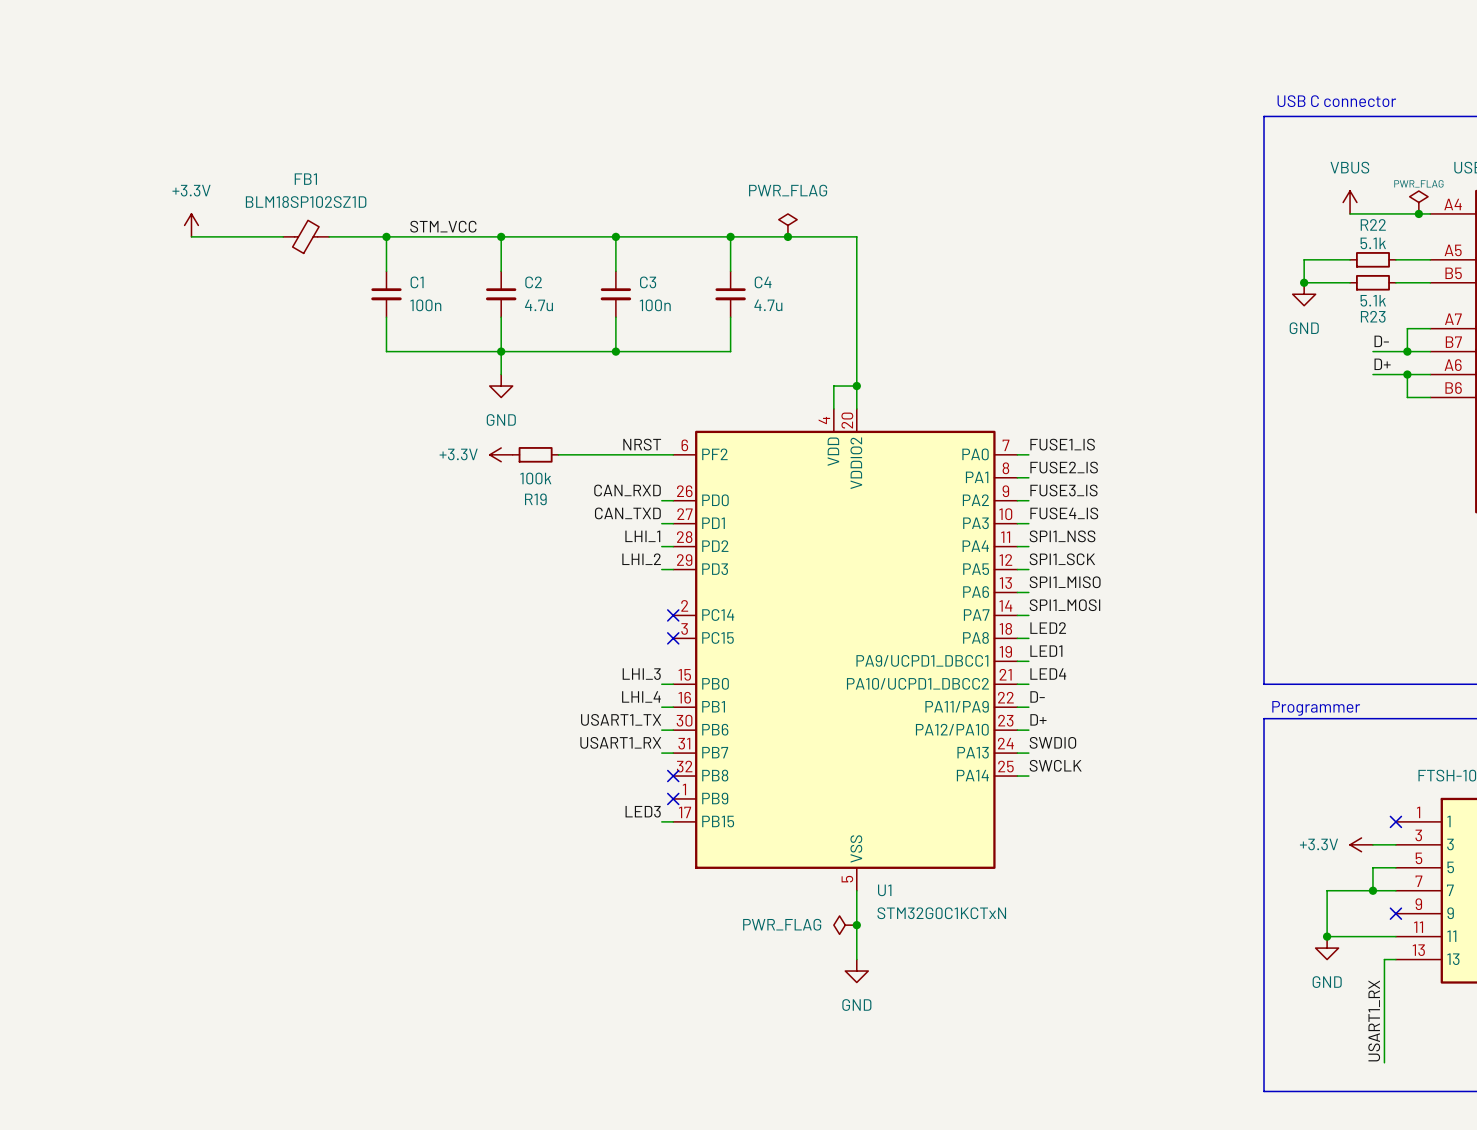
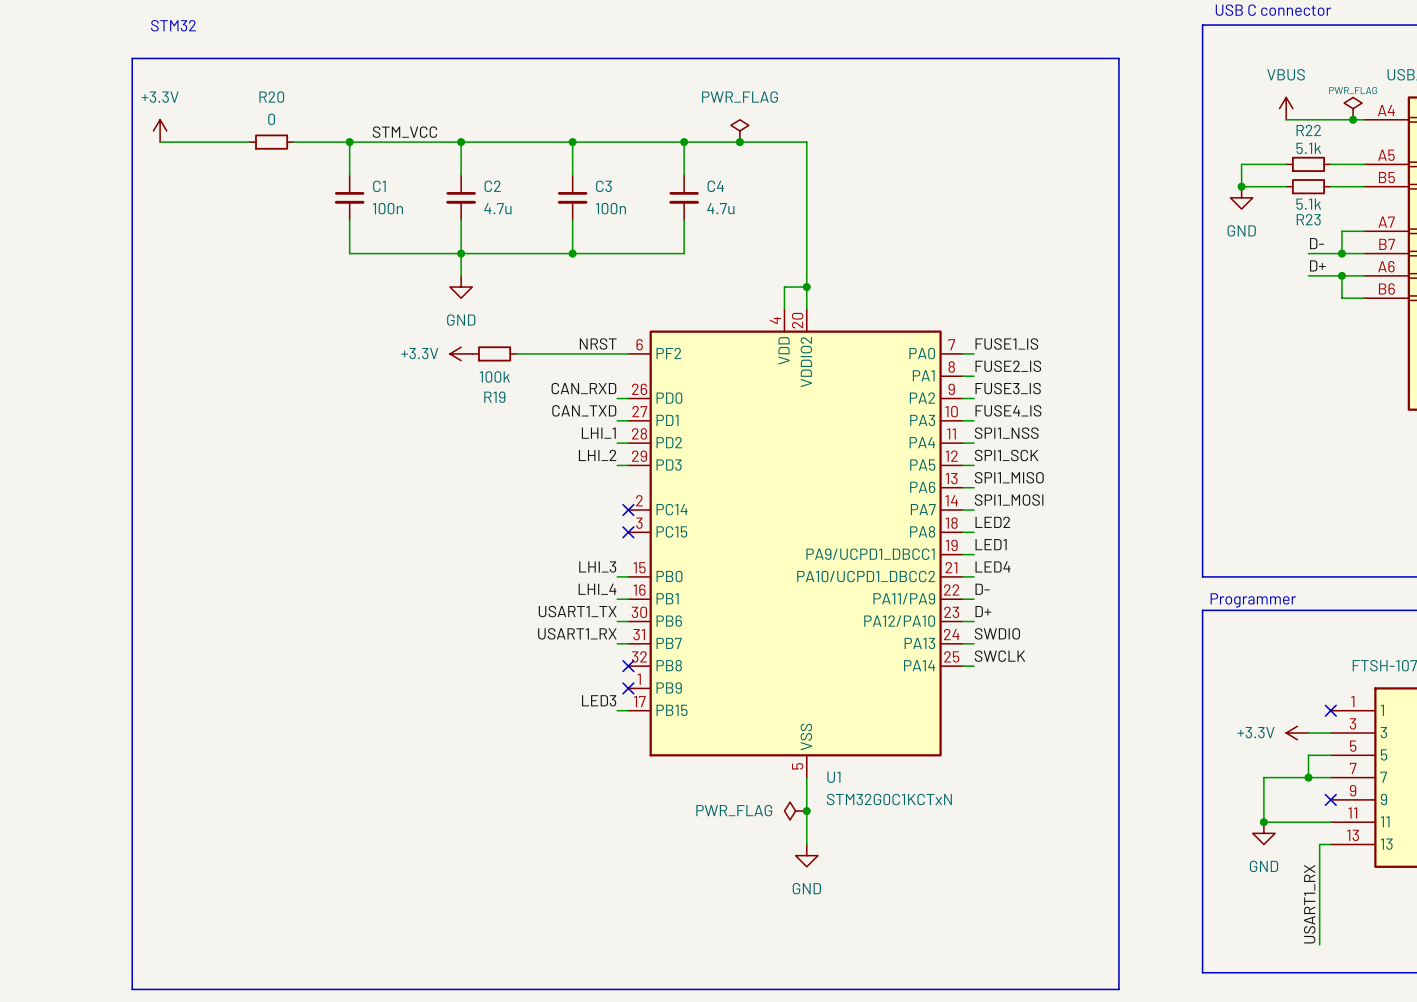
text: none -> STM32 (173, 25)
line: none -> (132, 58) (1118, 58) (1118, 989) (132, 989) (132, 58)
FB1: BLM18SP102SZ1D (306, 236) -> none
R20: none -> 0 (271, 142)

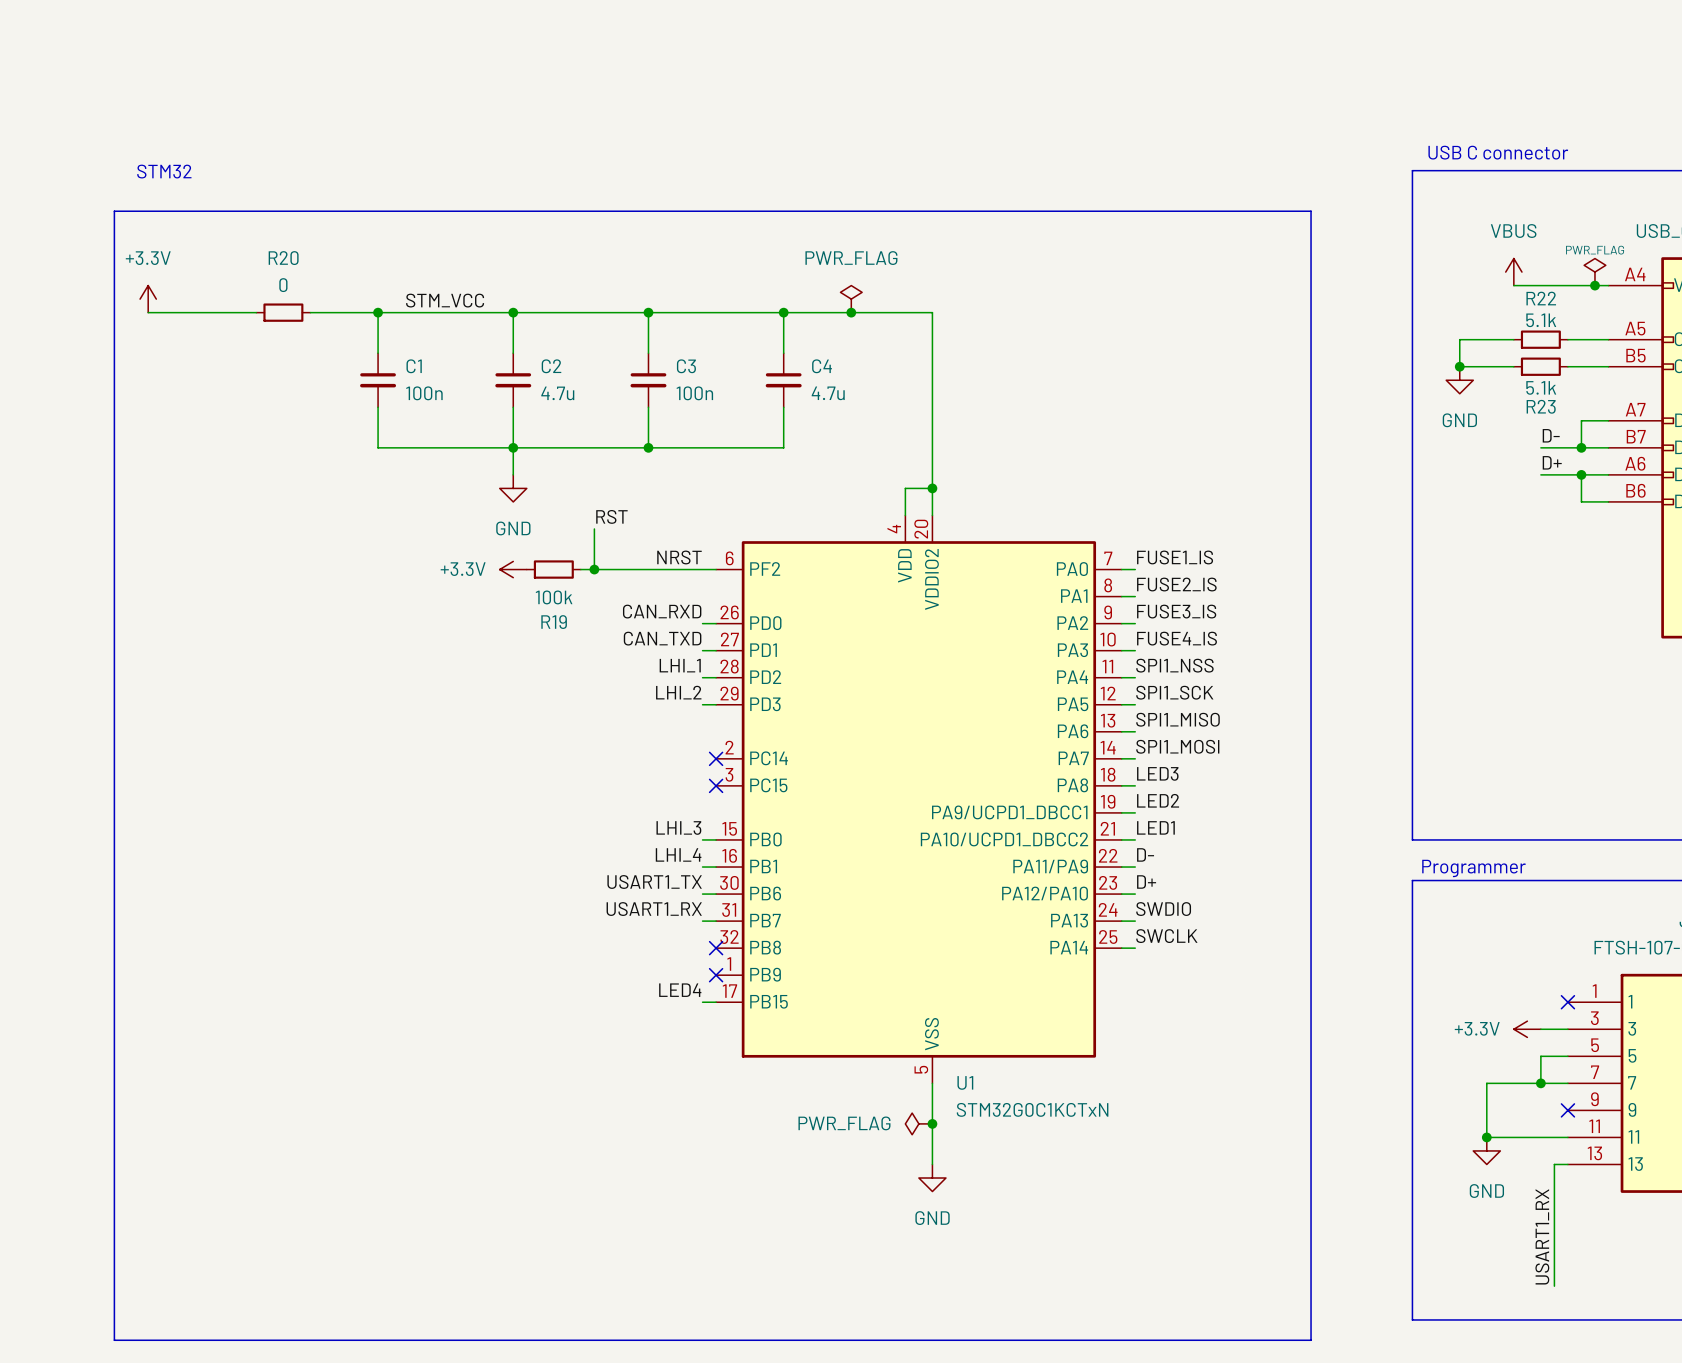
label: none -> RST (611, 516)
wire: none -> (594, 528) (594, 569)
junction: none -> (594, 569)
label: LED2 (992, 522) -> LED3 (1157, 773)
label: LED1 (991, 544) -> LED2 (1158, 800)
label: LED4 (992, 566) -> LED1 (1155, 827)
label: LED3 (599, 700) -> LED4 (680, 990)

